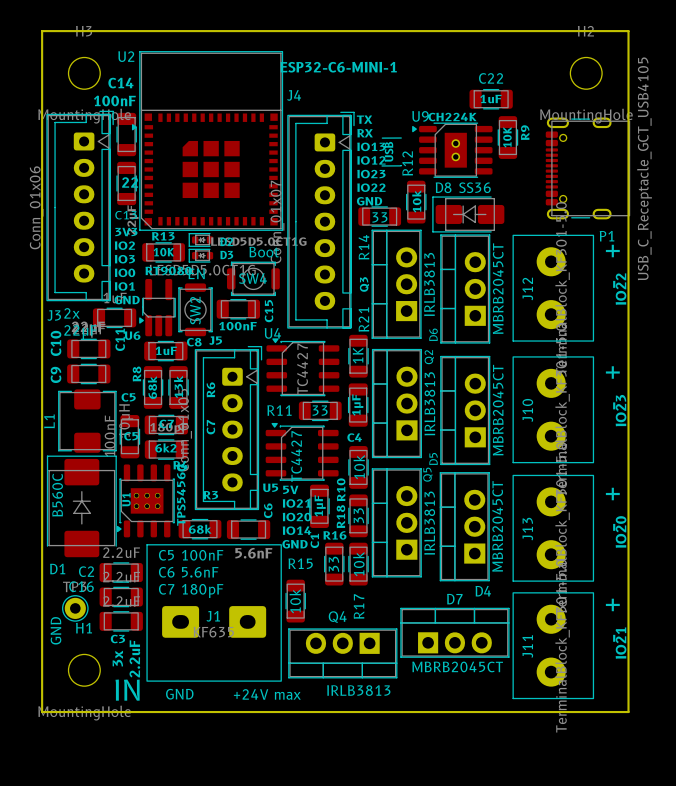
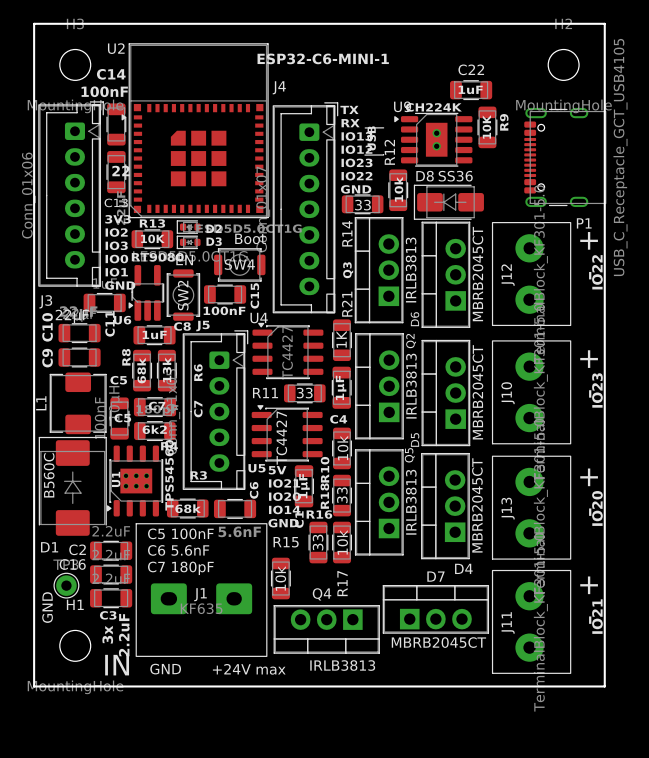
text: 2x (72, 313) -> none

